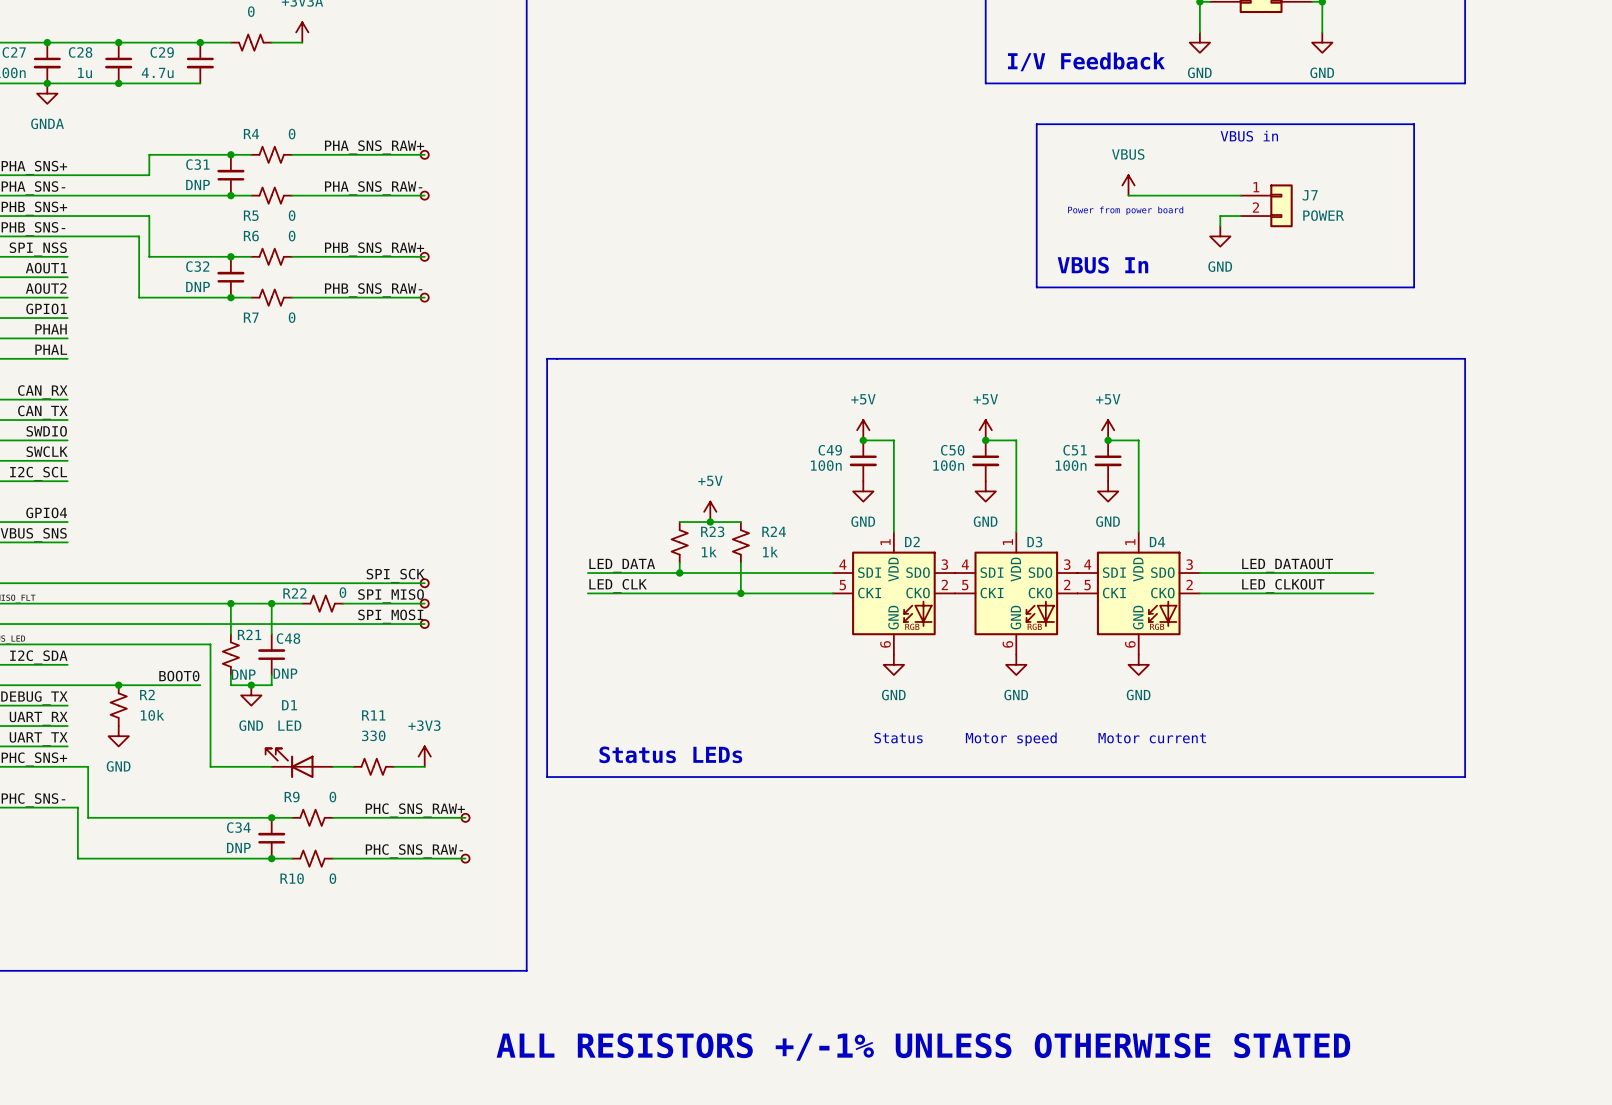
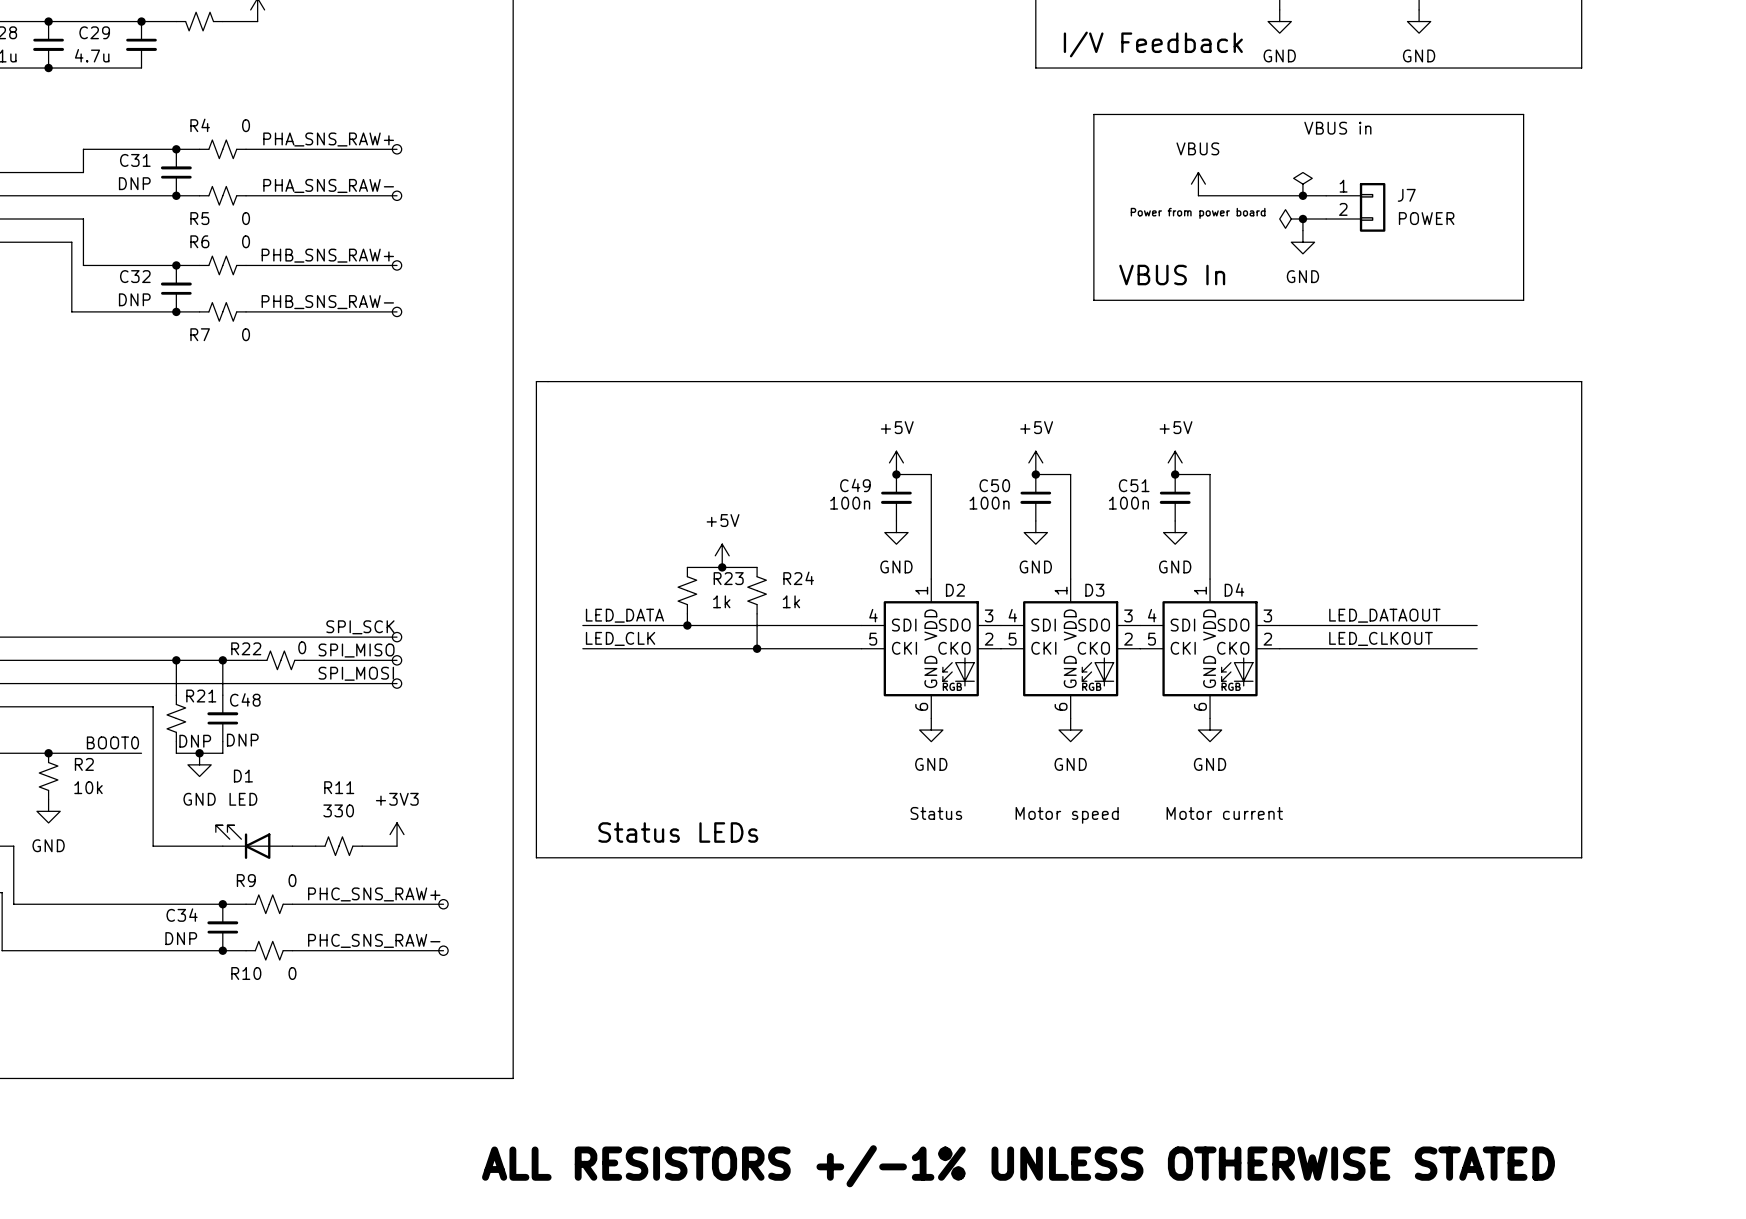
power symbol: none -> (1302, 184)
junction: none -> (1302, 195)
power symbol: none -> (1291, 219)
junction: none -> (1302, 219)

